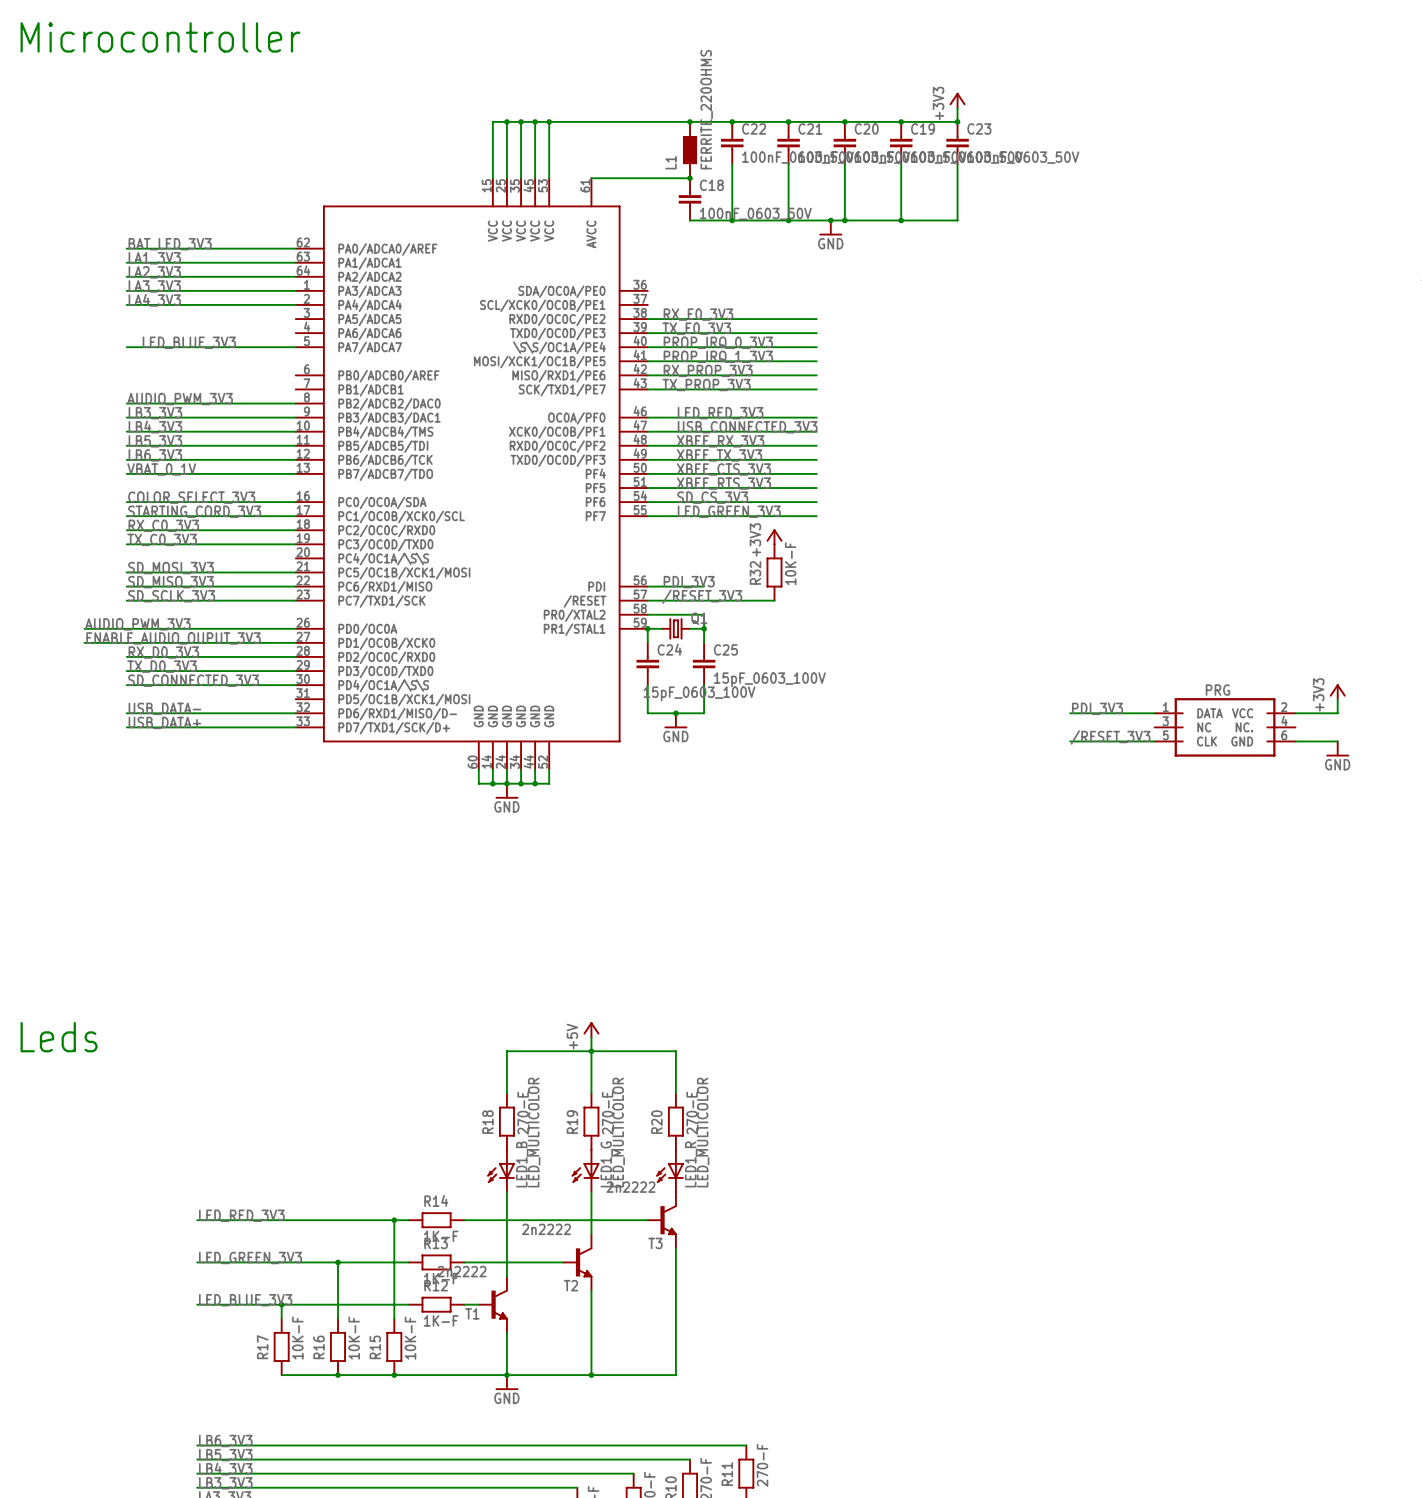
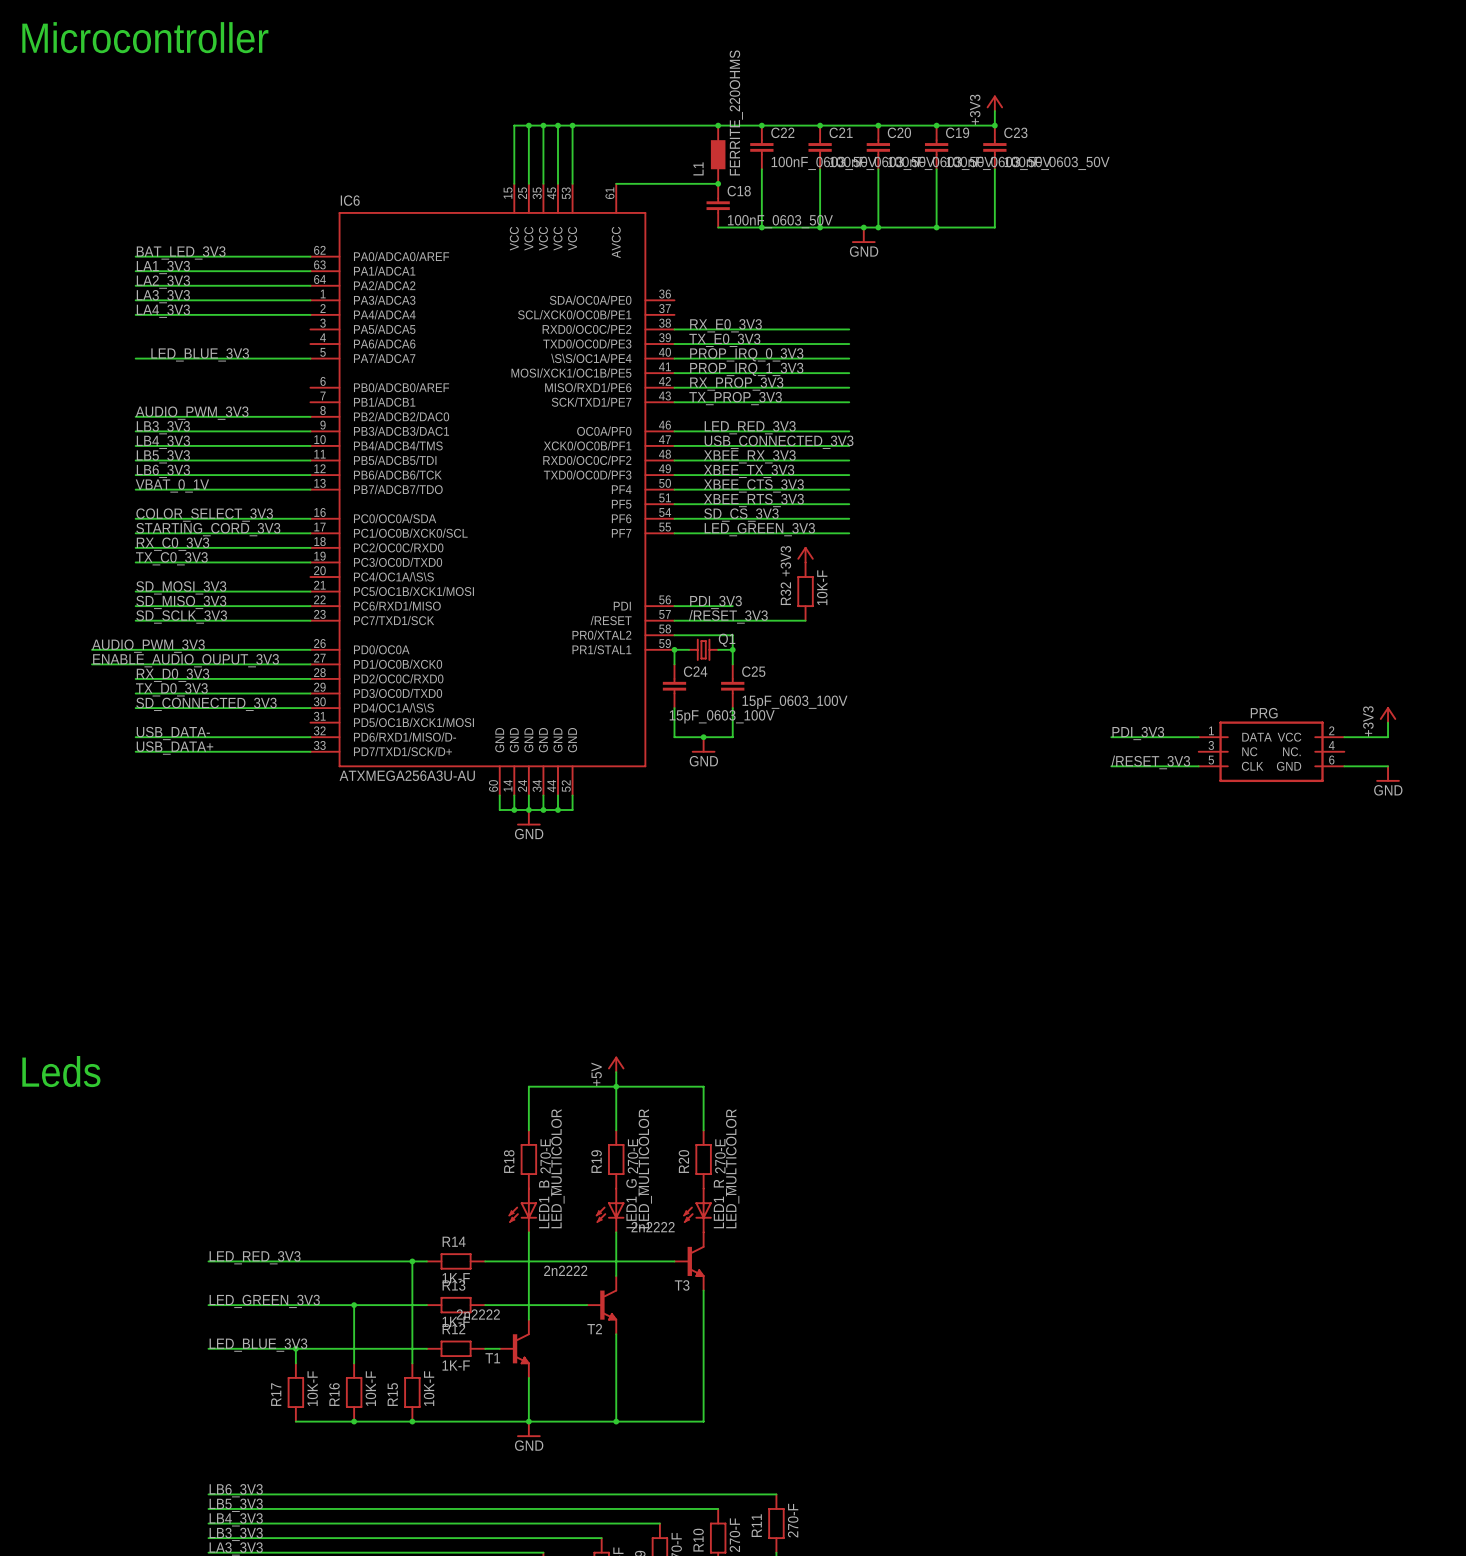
IC6 name: none -> IC6 (350, 200)
IC6 value: none -> ATXMEGA256A3U-AU (407, 775)

